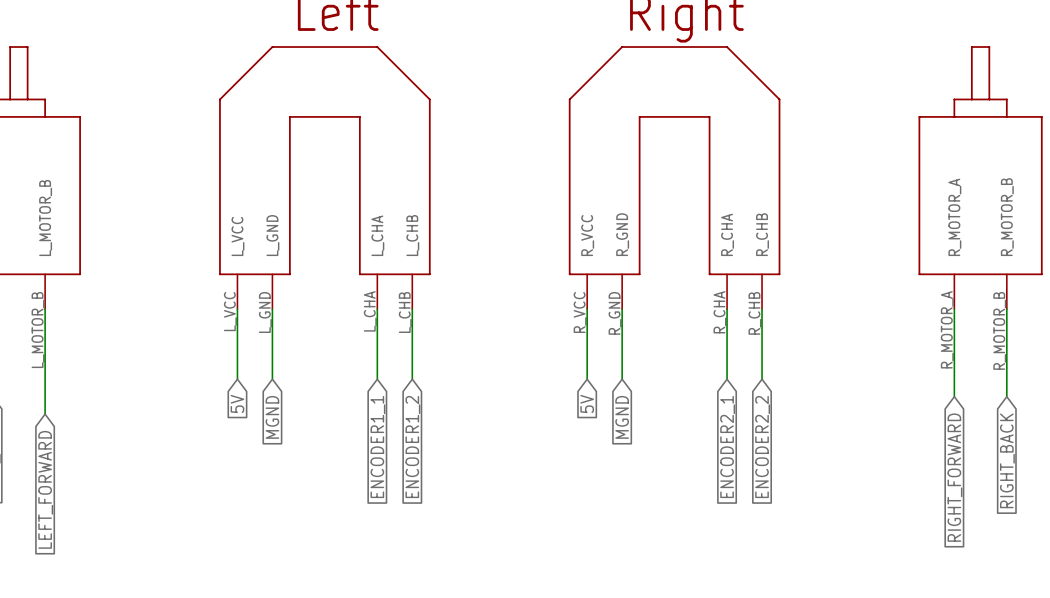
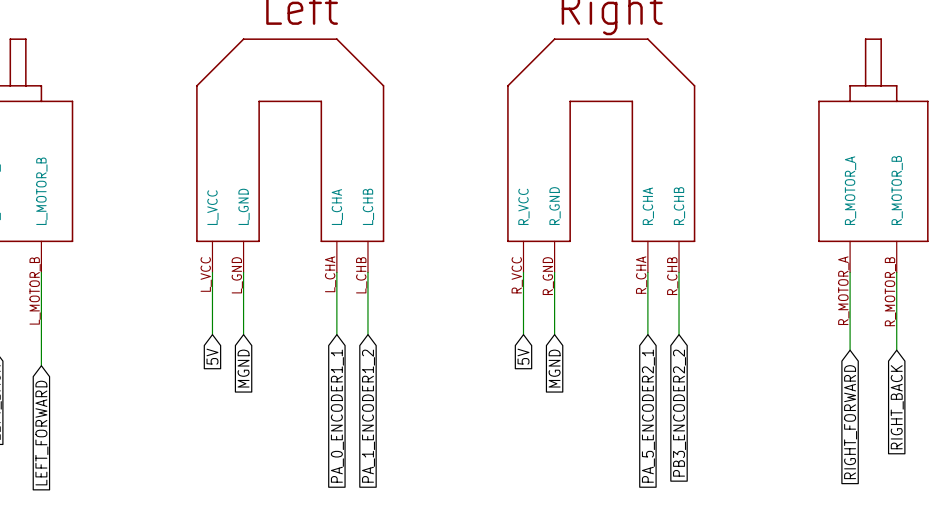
global label: ENCODER1_1 (377, 447) -> PA_0_ENCODER1_1 (337, 416)
global label: ENCODER1_2 (412, 447) -> PA_1_ENCODER1_2 (368, 416)
global label: ENCODER2_1 (727, 447) -> PA_5_ENCODER2_1 (648, 416)
global label: ENCODER2_2 (762, 447) -> PB3_ENCODER2_2 (679, 413)

